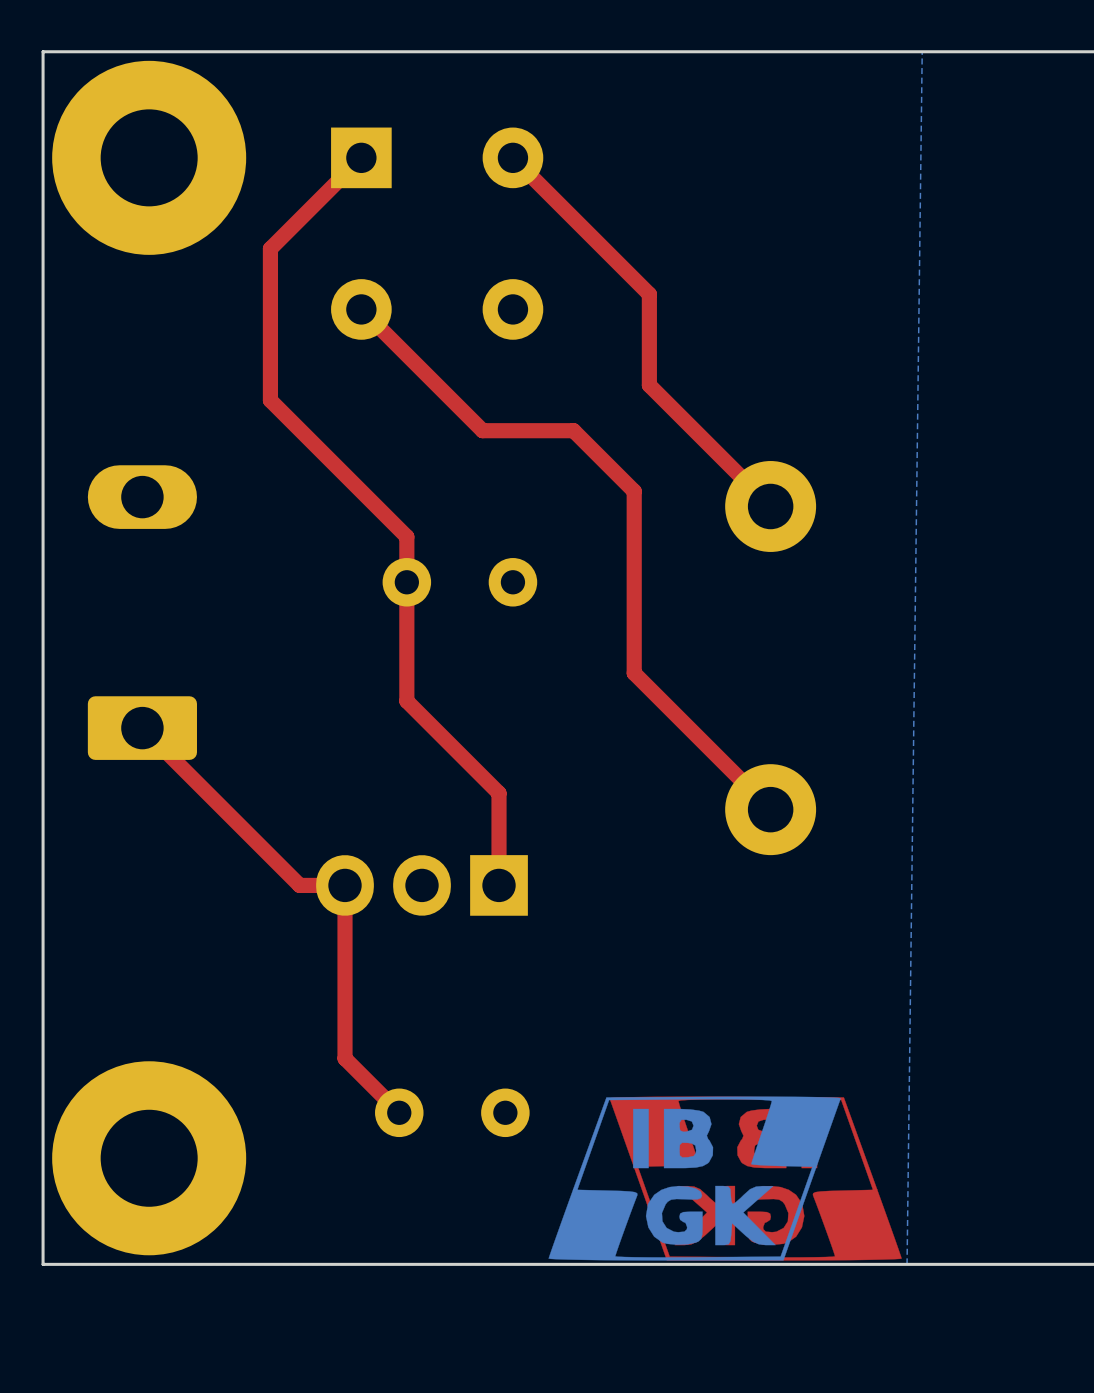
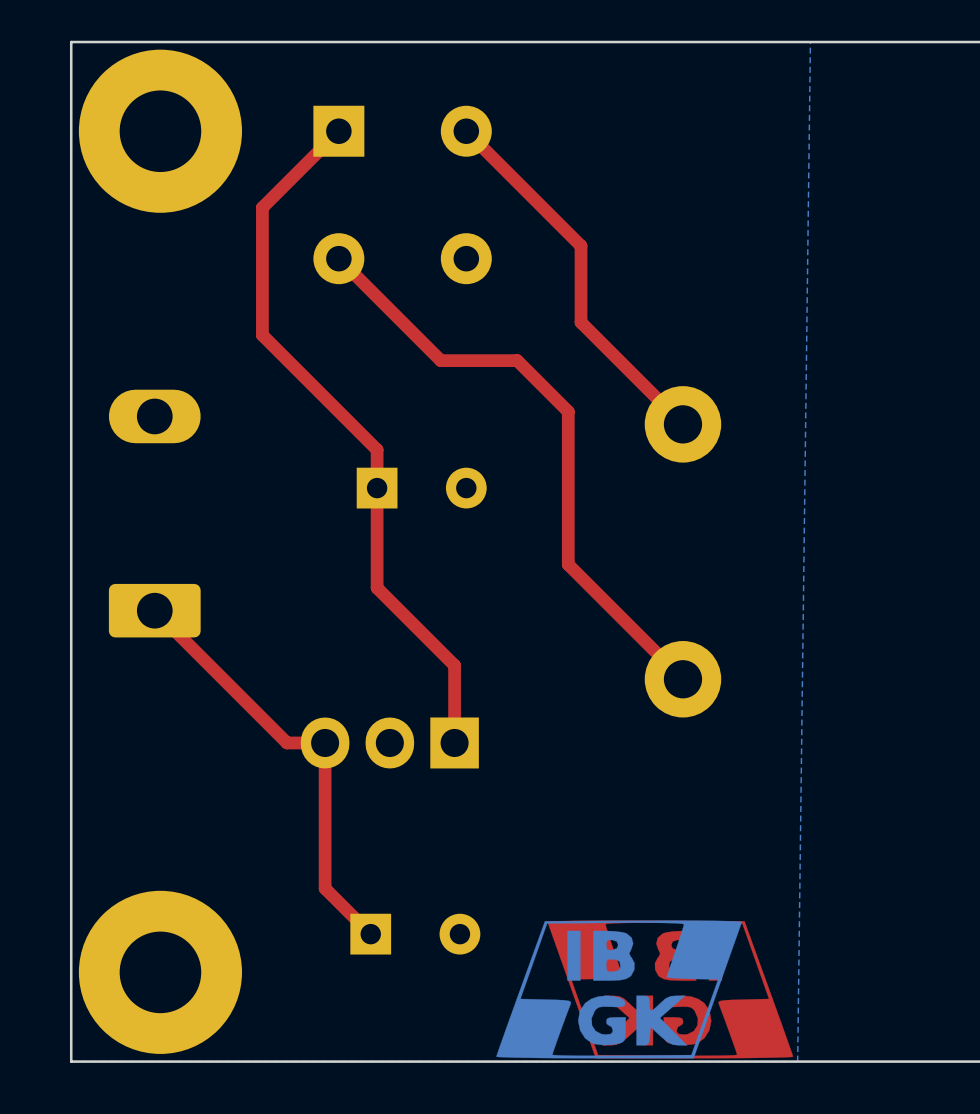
part footprint: [382, 558, 538, 607] -> [356, 467, 487, 509]
part footprint: [375, 1088, 530, 1138] -> [350, 913, 481, 955]

